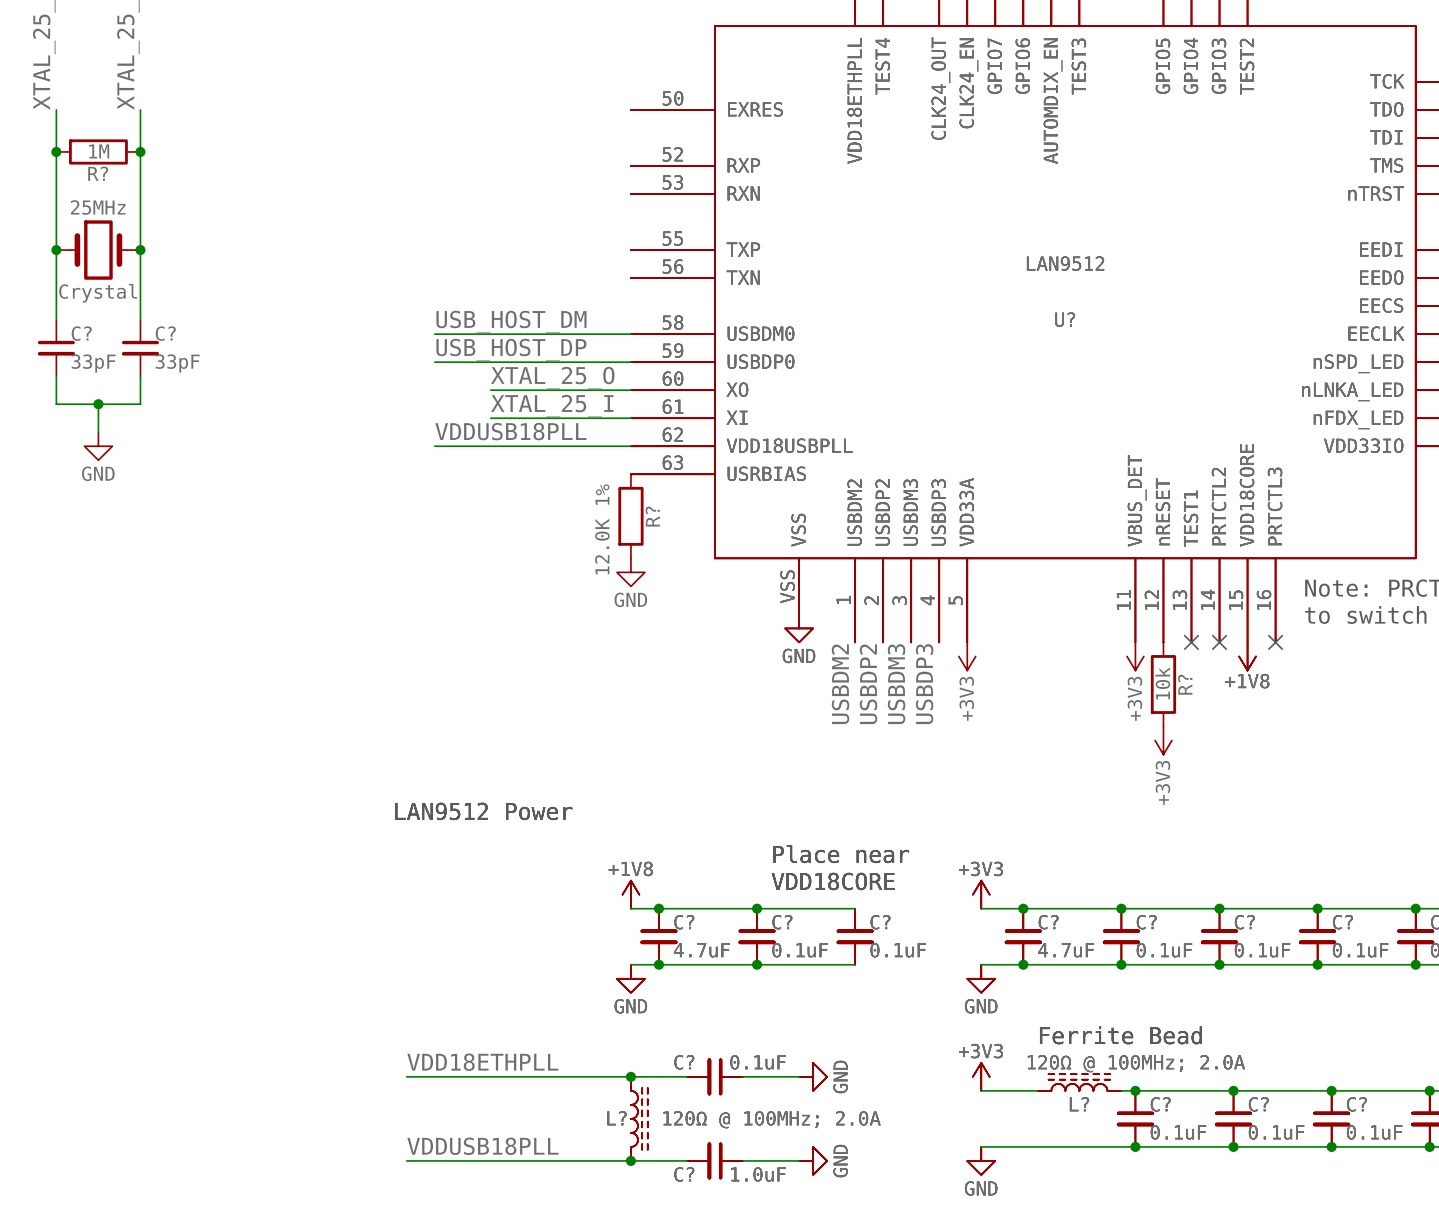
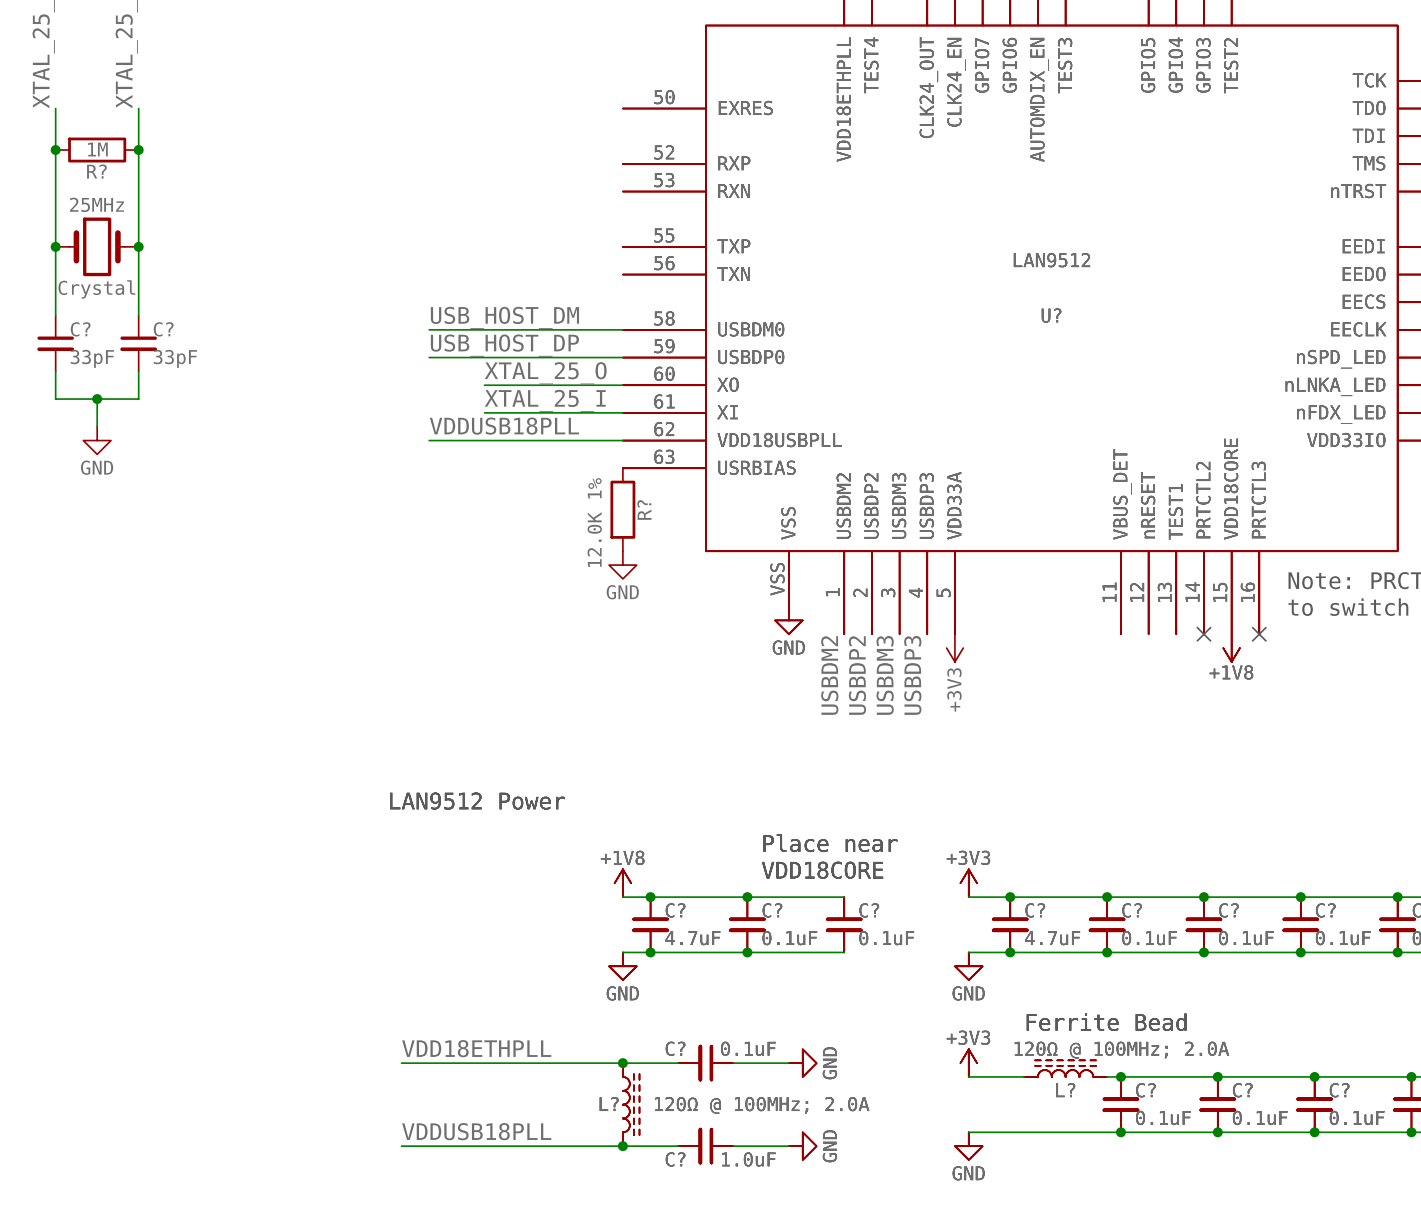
no-connect mark: (1191, 642) -> none
power symbol: +3V3 (1135, 656) -> none
R?: 10k (1163, 684) -> none
power symbol: +3V3 (1163, 740) -> none

